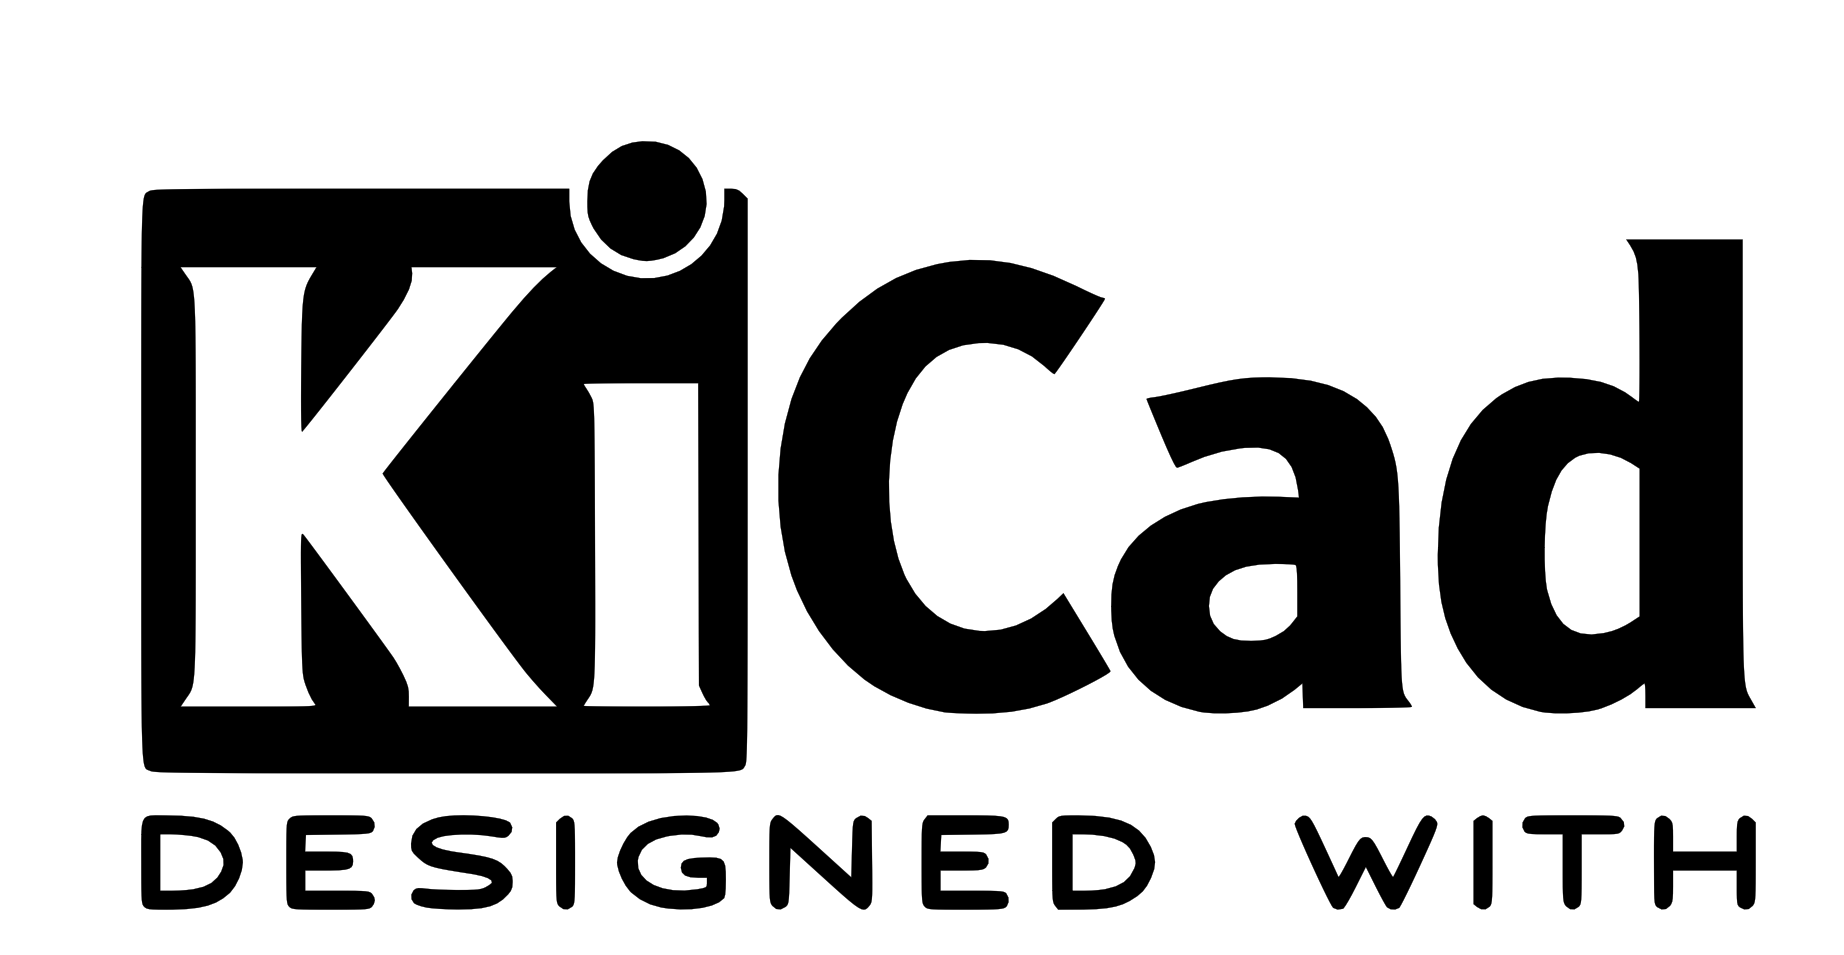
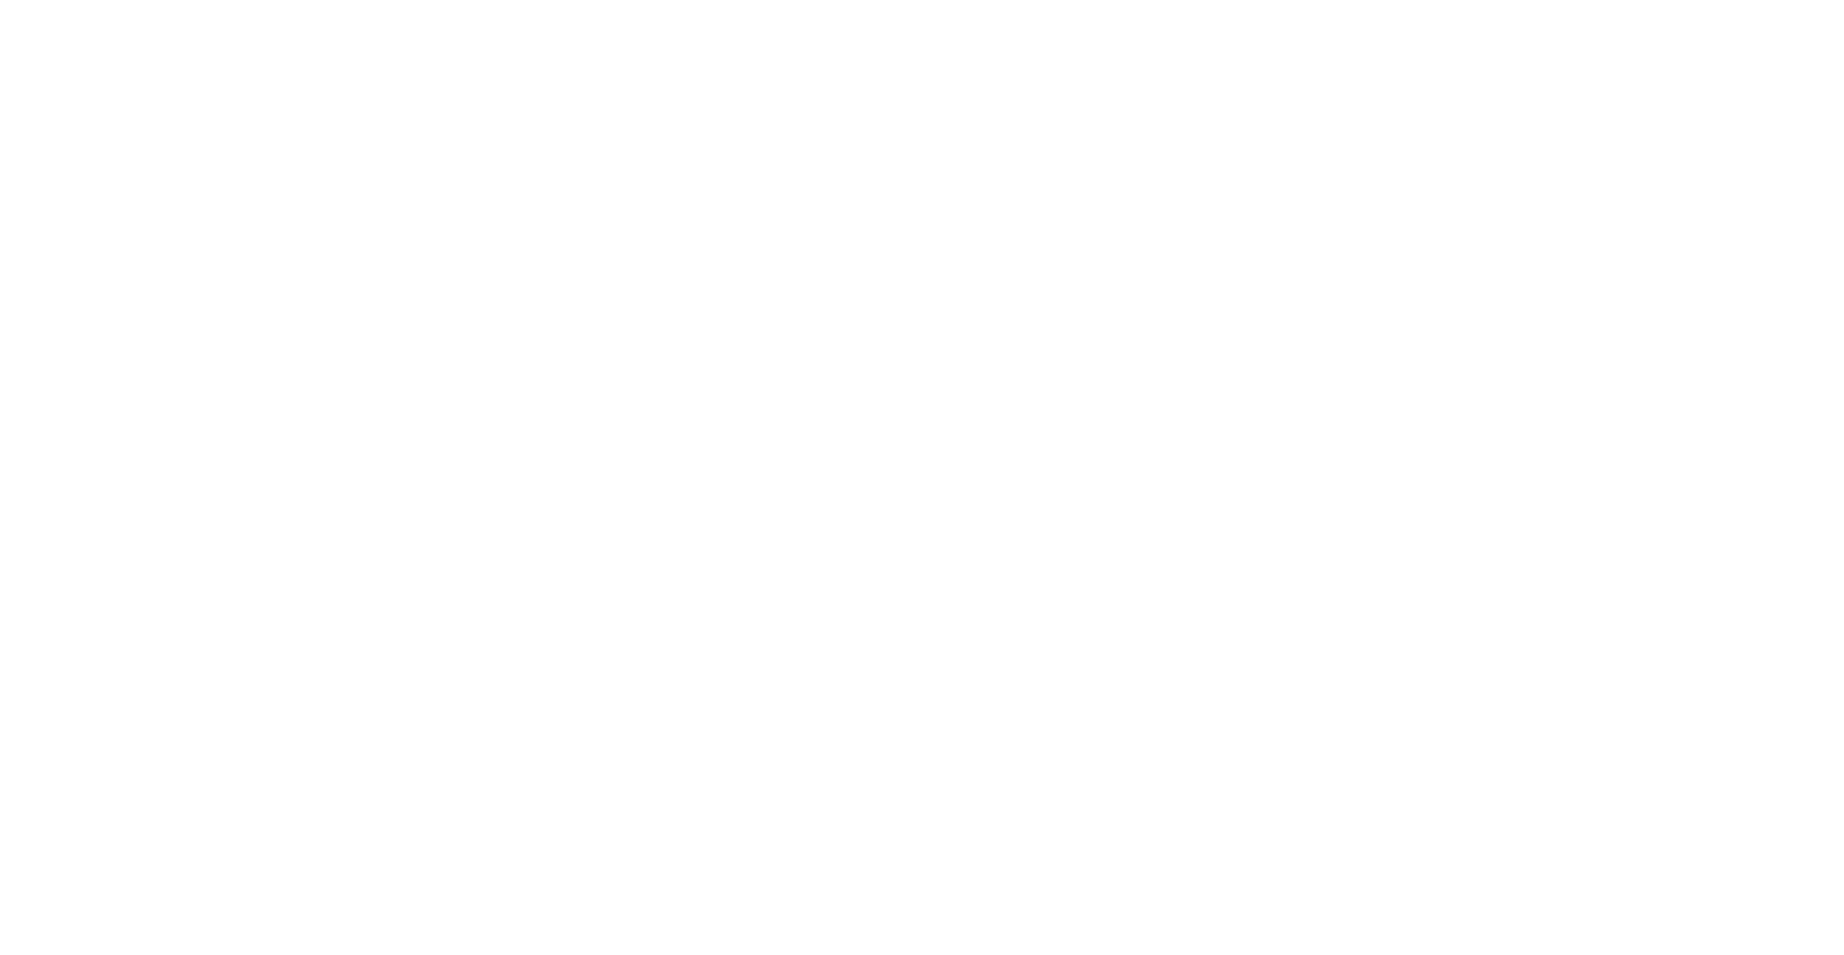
drawing: [141, 141, 1756, 910] -> none

